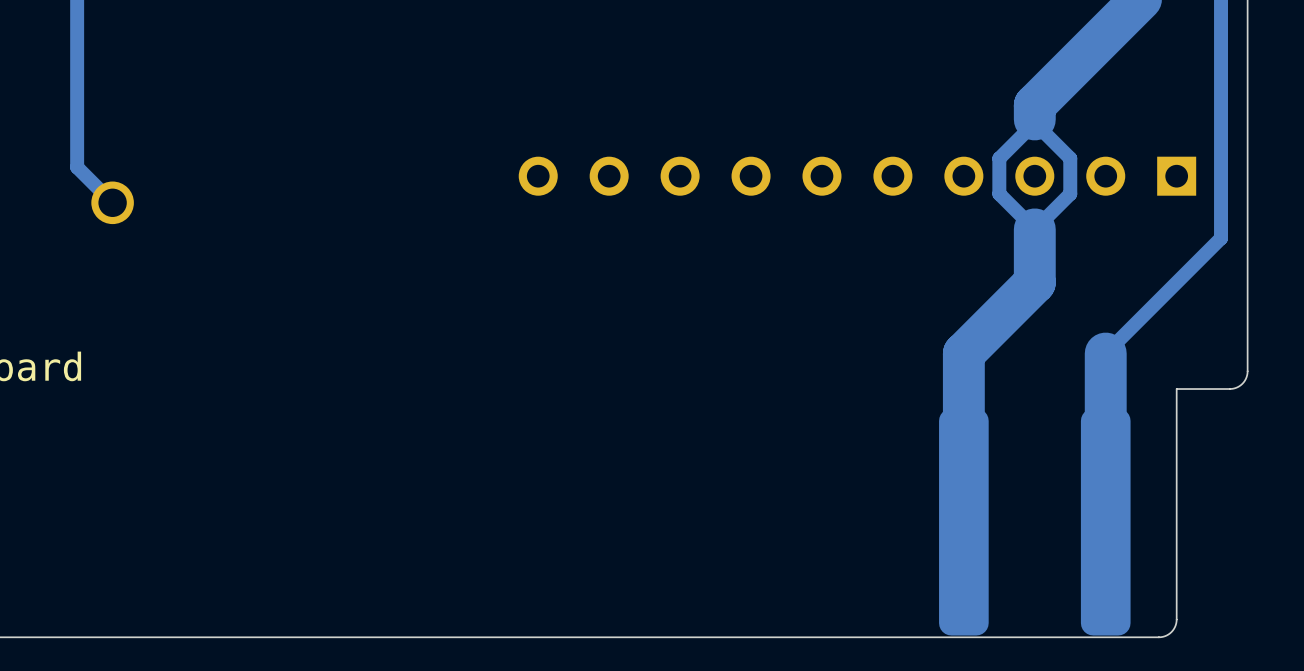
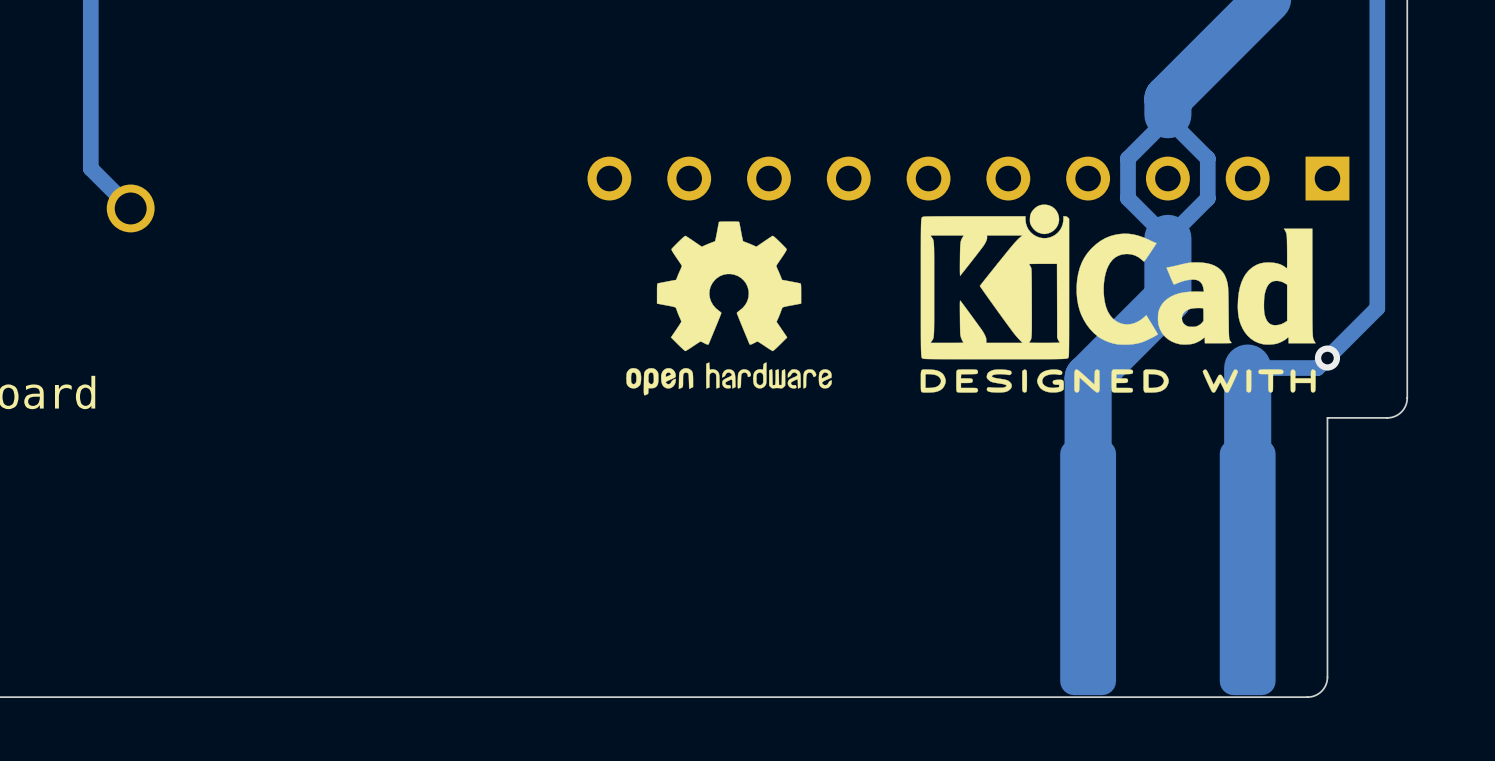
drawing: none -> [920, 204, 1316, 393]
drawing: none -> [626, 221, 832, 396]
track: (1221, 238) (1105, 353) -> (1377, 248) (1377, 308) (1317, 368) (1247, 368) (1247, 378)
via: none -> (1327, 358)

